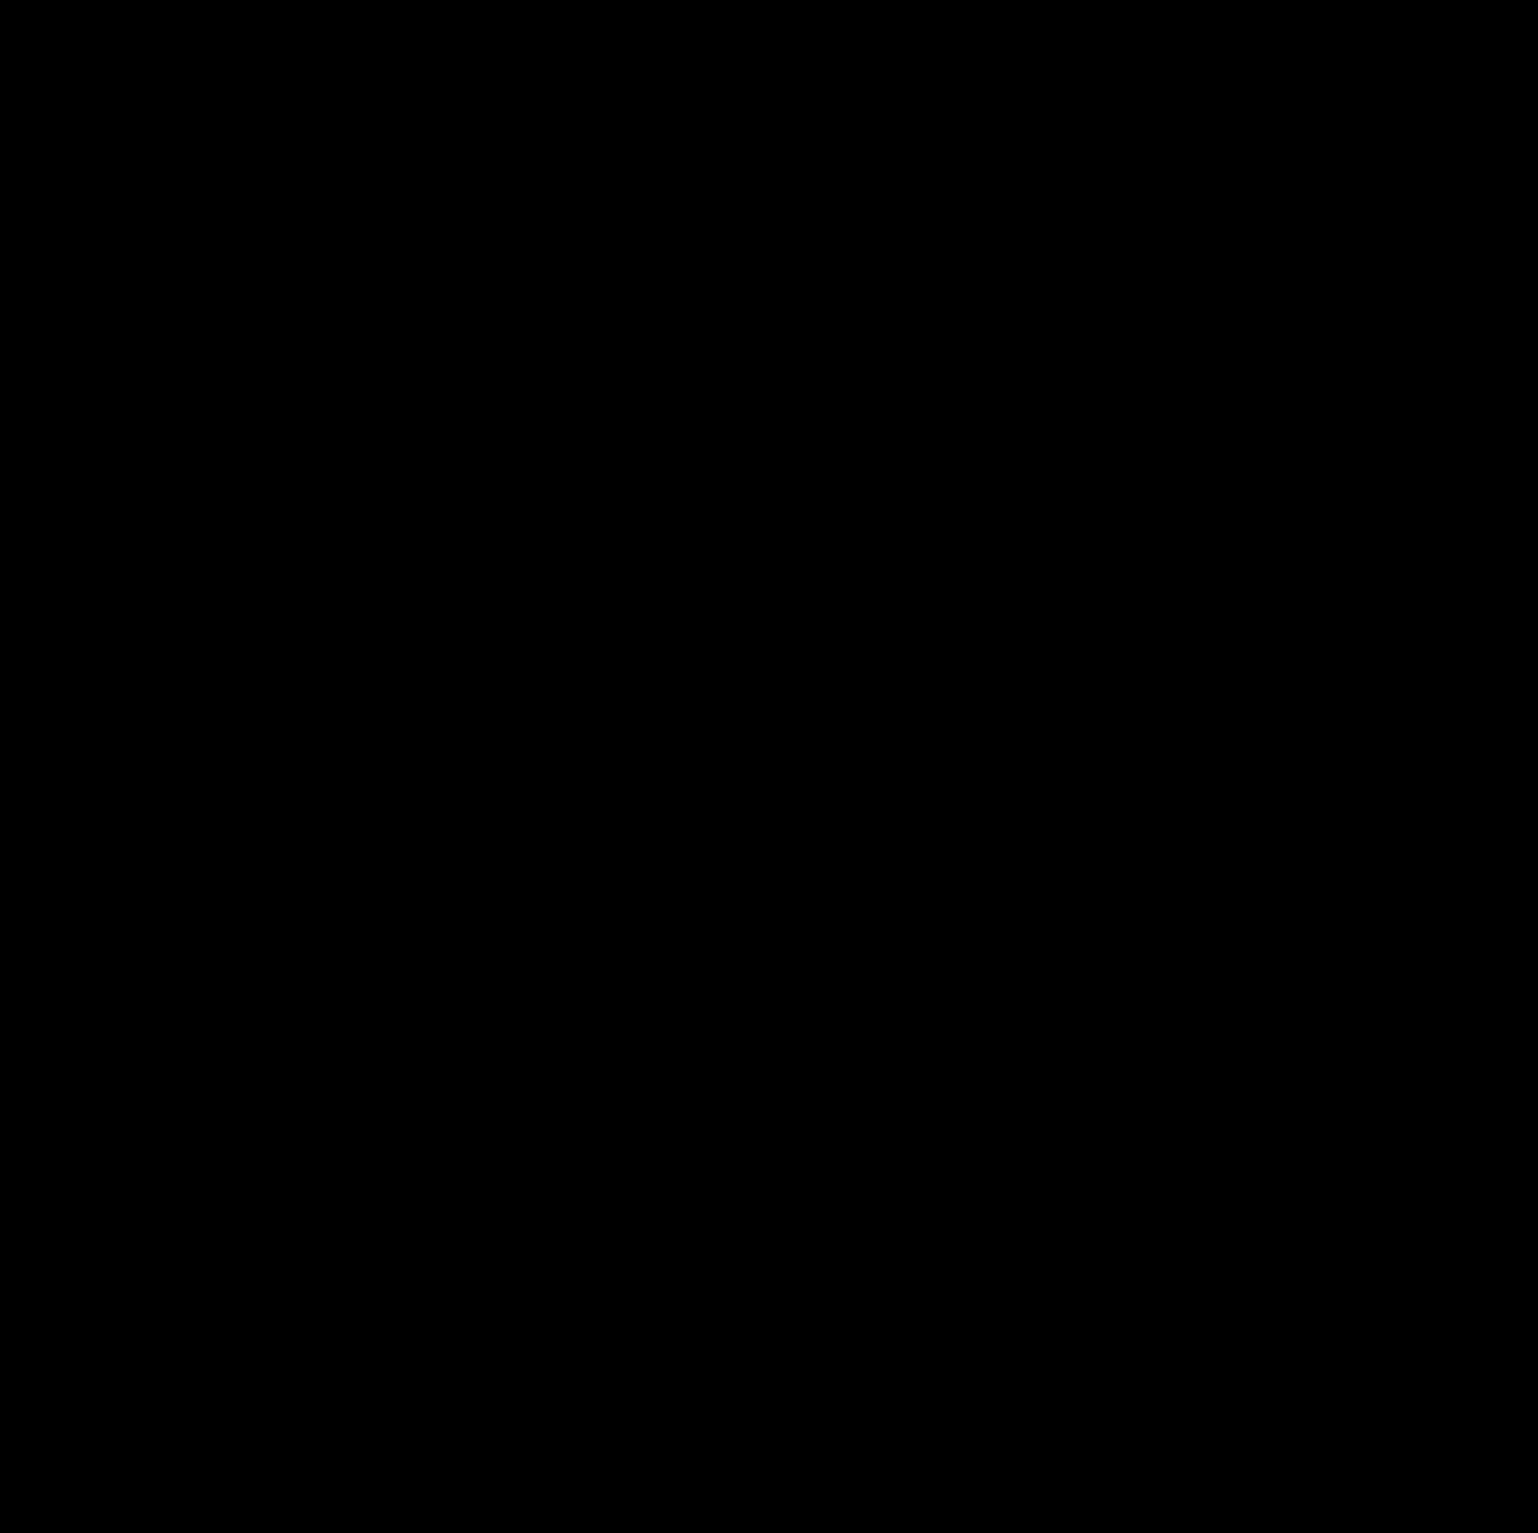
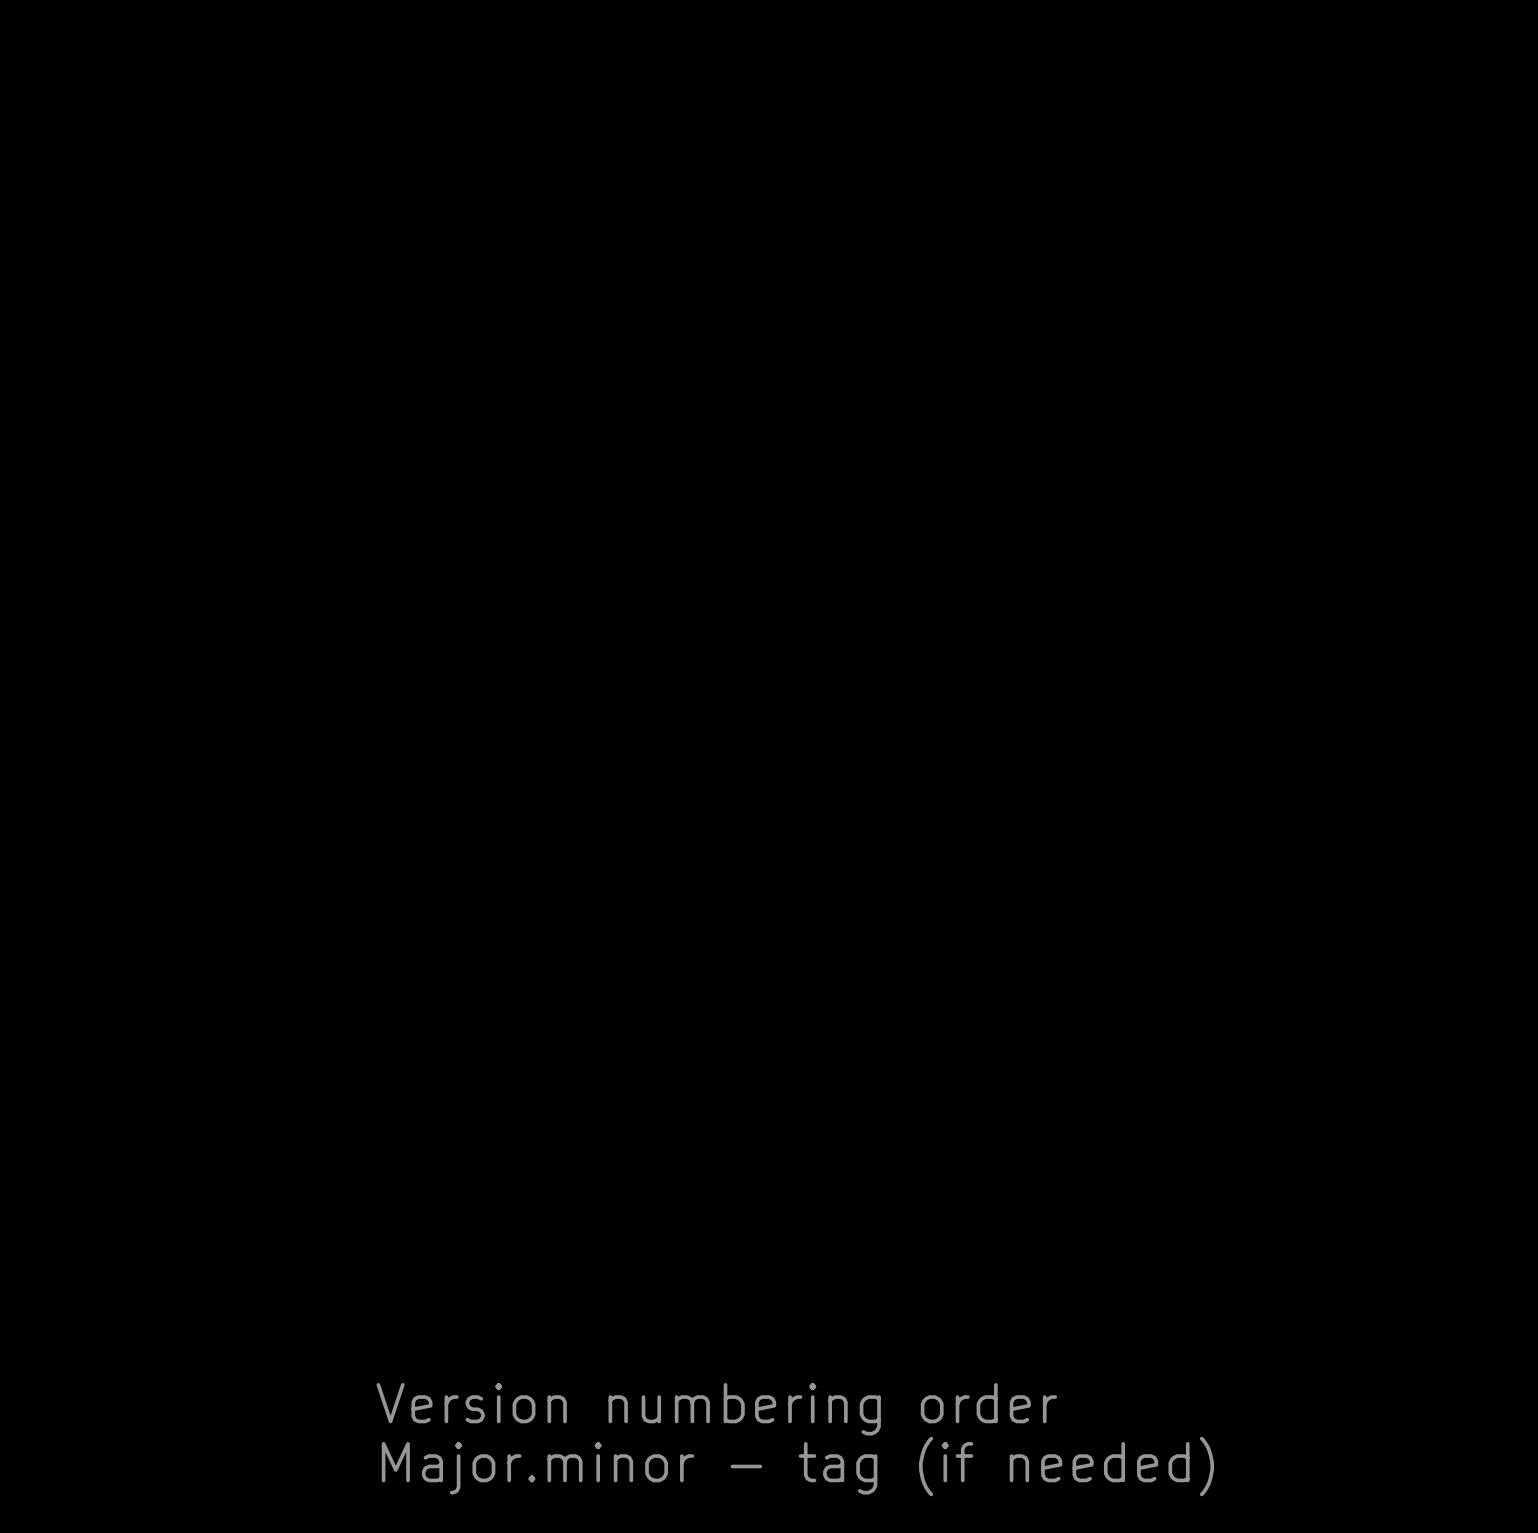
text: none -> Version numbering order (716, 1409)
text: none -> Major.minor - tag (if needed) (797, 1466)

